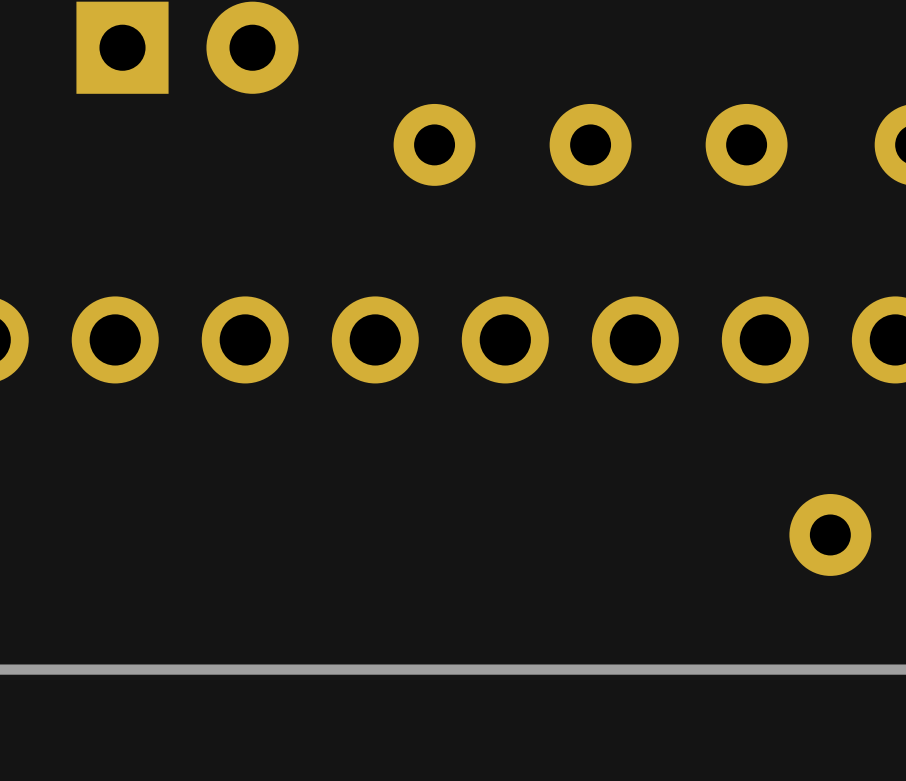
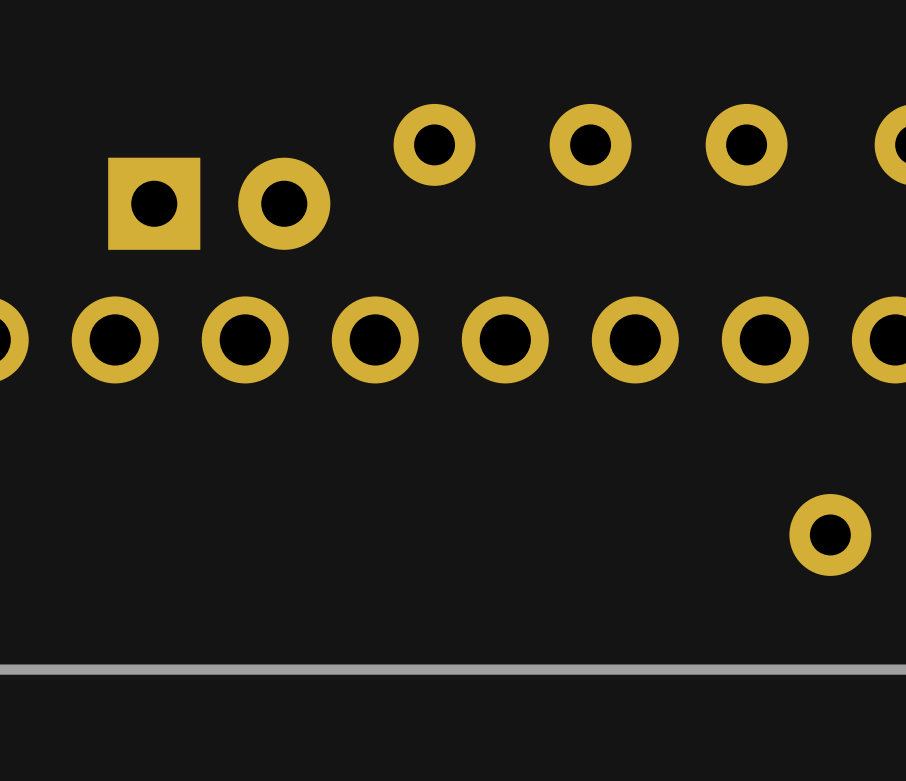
part: (187, 47) -> none
part: none -> (219, 203)

